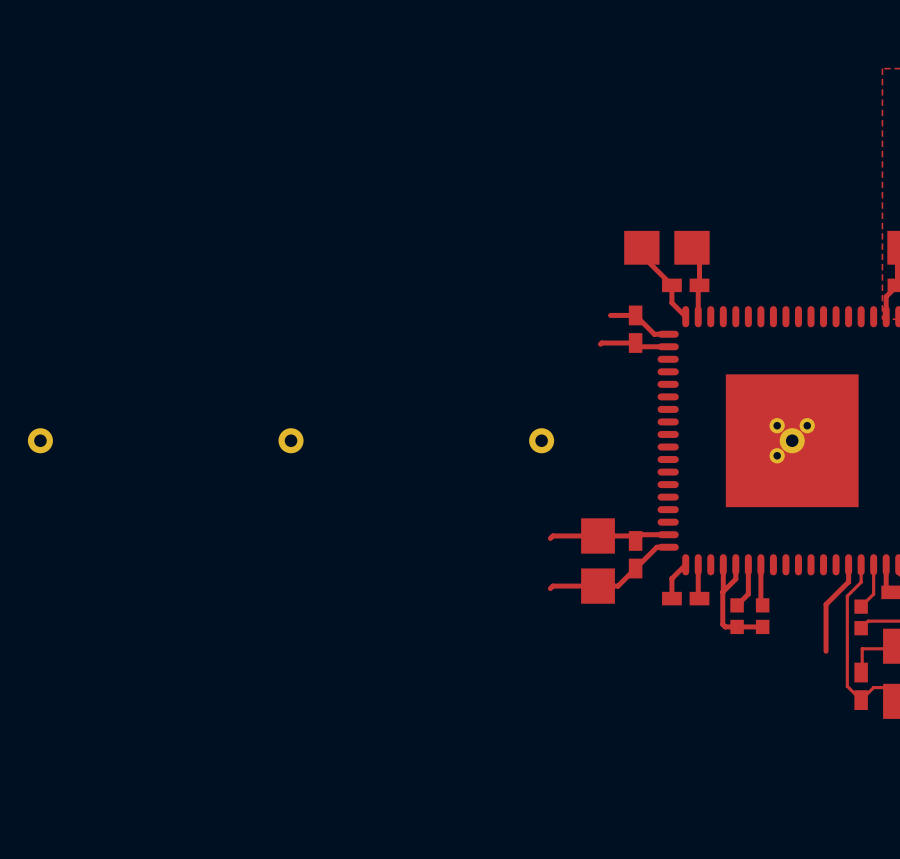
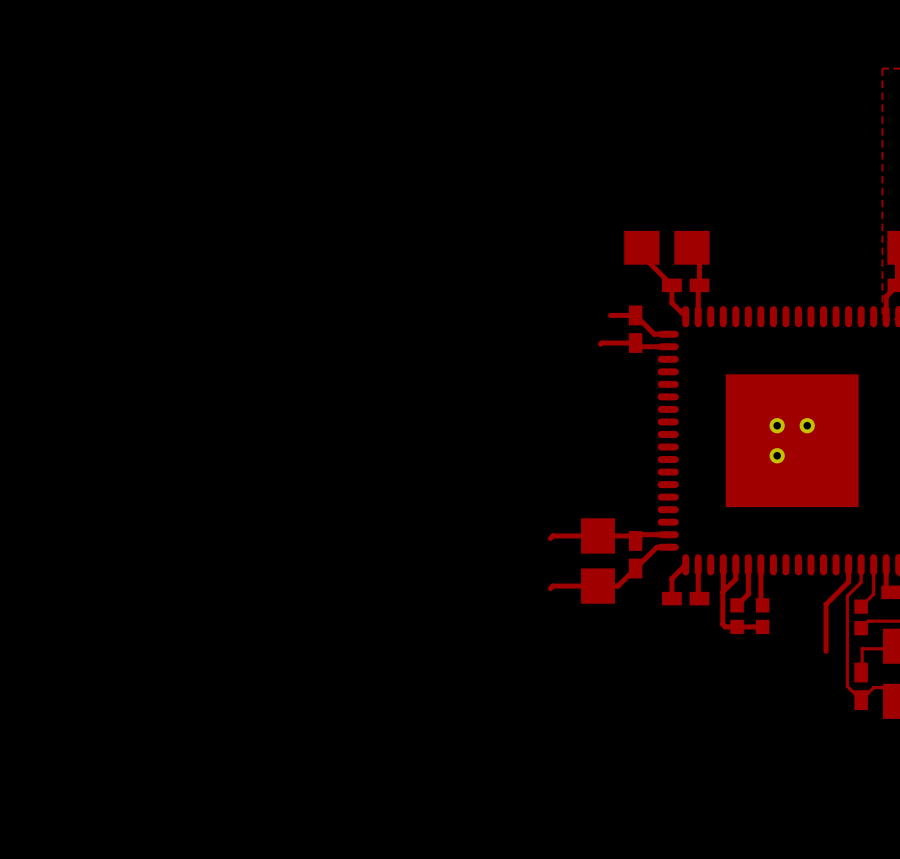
part: (40, 440) -> none
part: (291, 440) -> none
part: (541, 440) -> none
part: (792, 440) -> none

